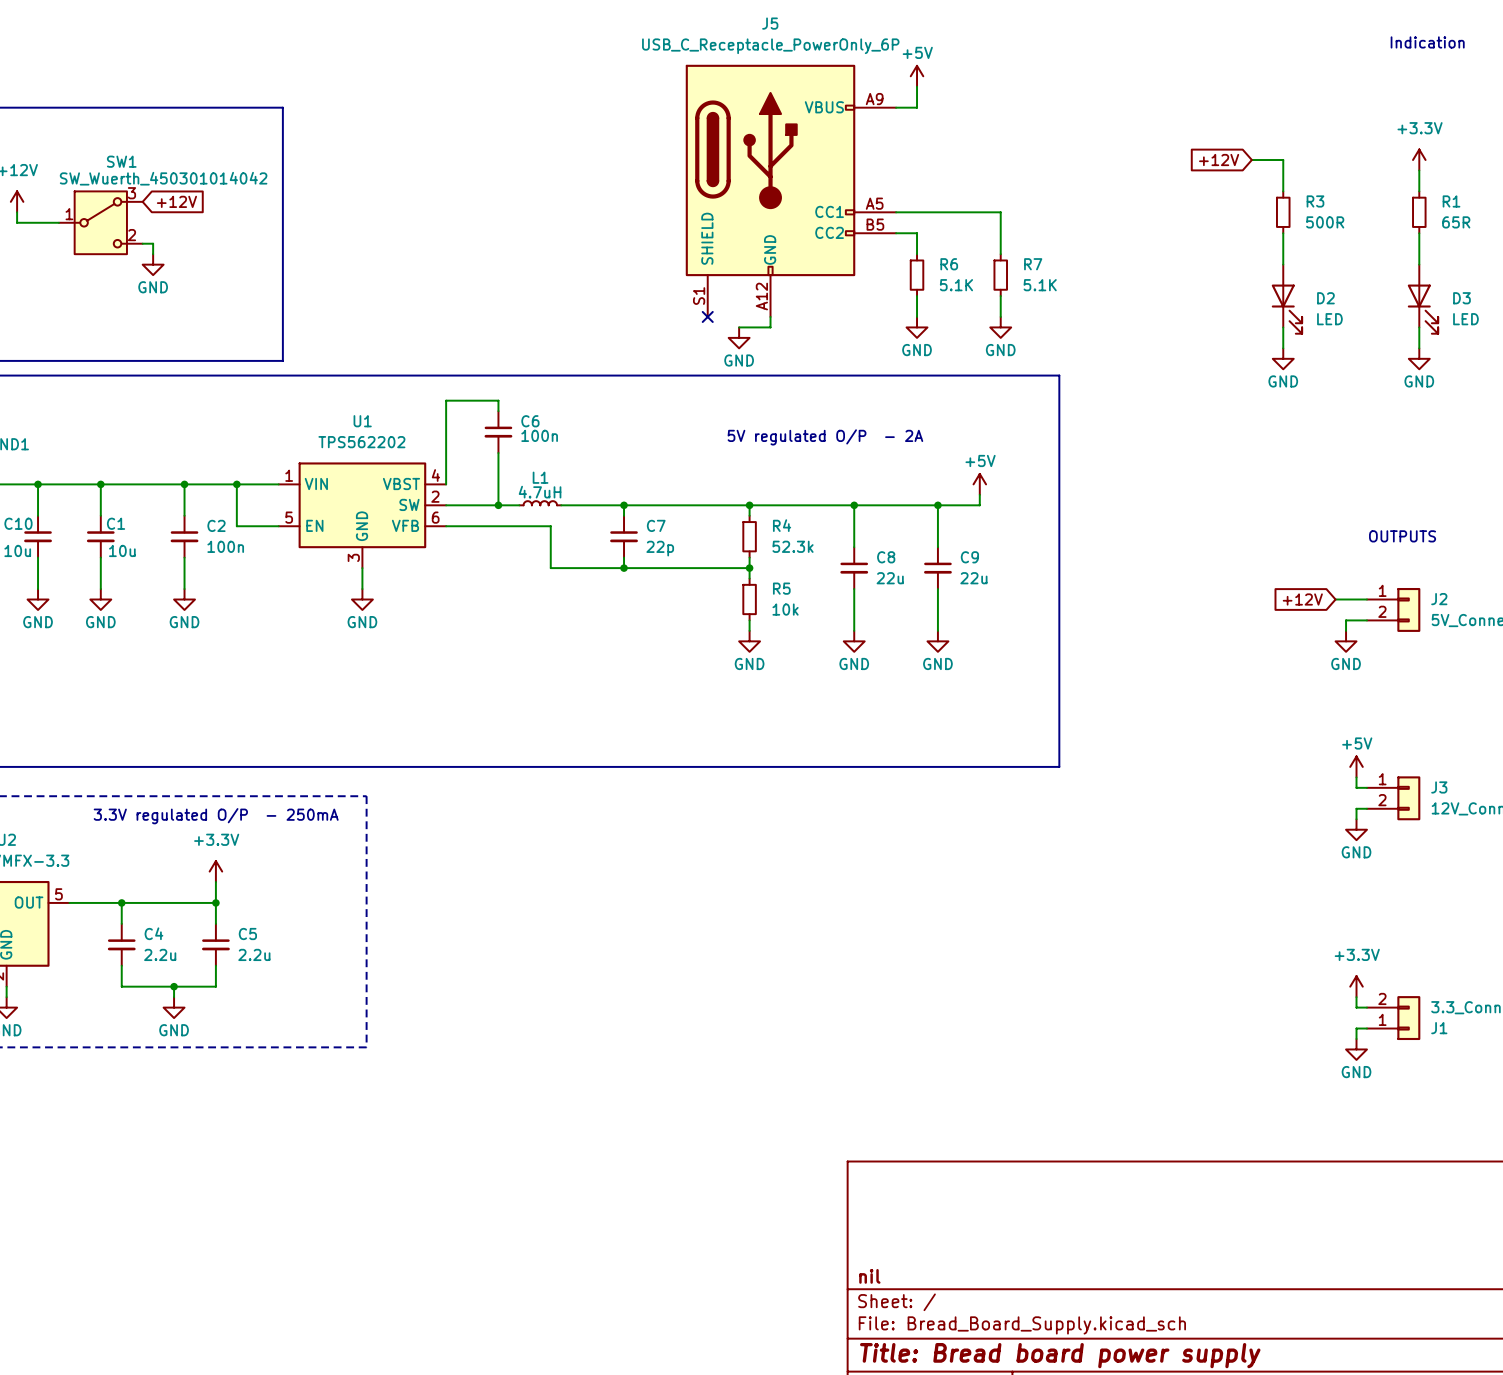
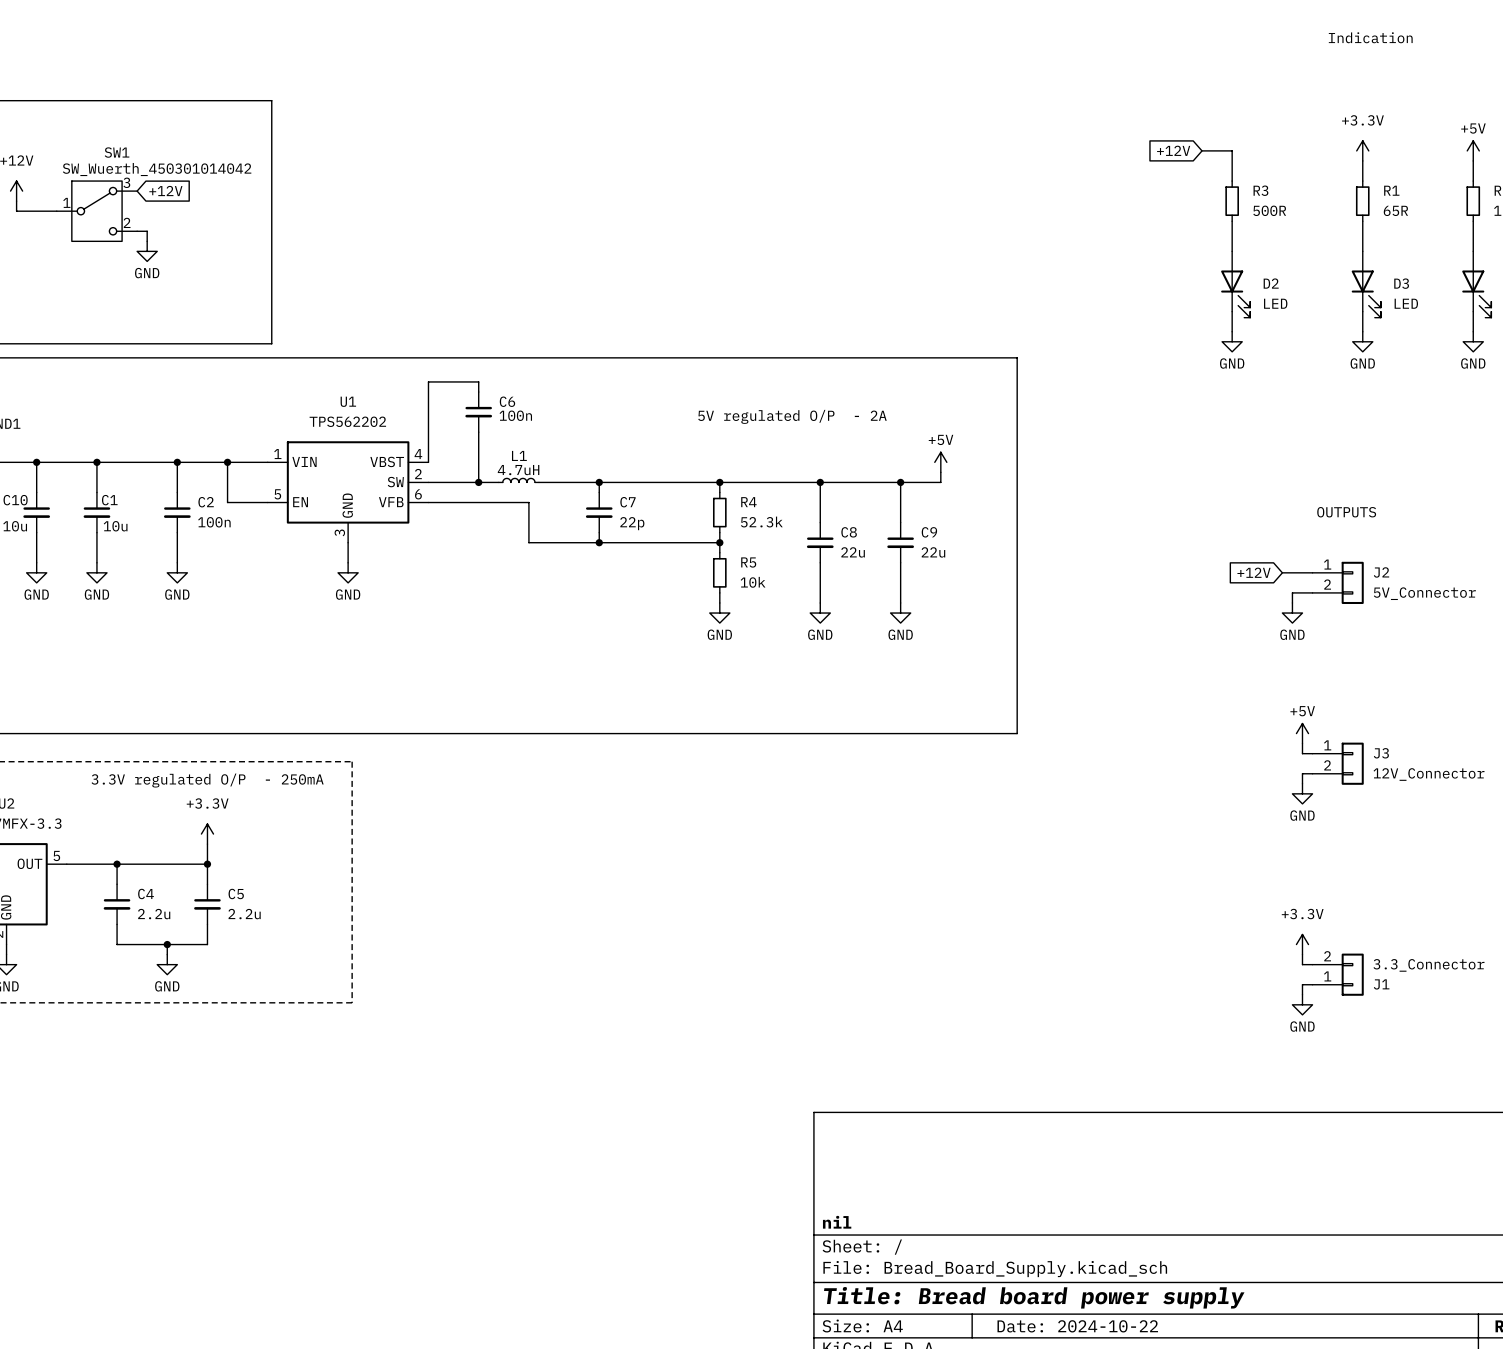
power symbol: +5V (917, 76) -> none
wire: (917, 86) (917, 107) (896, 107) -> none
J5: USB_C_Receptacle_PowerOnly_6P (790, 190) -> none
wire: (896, 212) (1000, 212) (1000, 254) -> none
wire: (896, 233) (917, 233) (917, 254) -> none
R6: 5.1K (917, 275) -> none
R7: 5.1K (1000, 275) -> none
wire: (917, 296) (917, 316) -> none
wire: (1000, 296) (1000, 316) -> none
no-connect mark: (707, 316) -> none
wire: (770, 316) (770, 327) (739, 327) -> none
power symbol: GND (917, 327) -> none
power symbol: GND (1000, 327) -> none
power symbol: GND (739, 337) -> none

